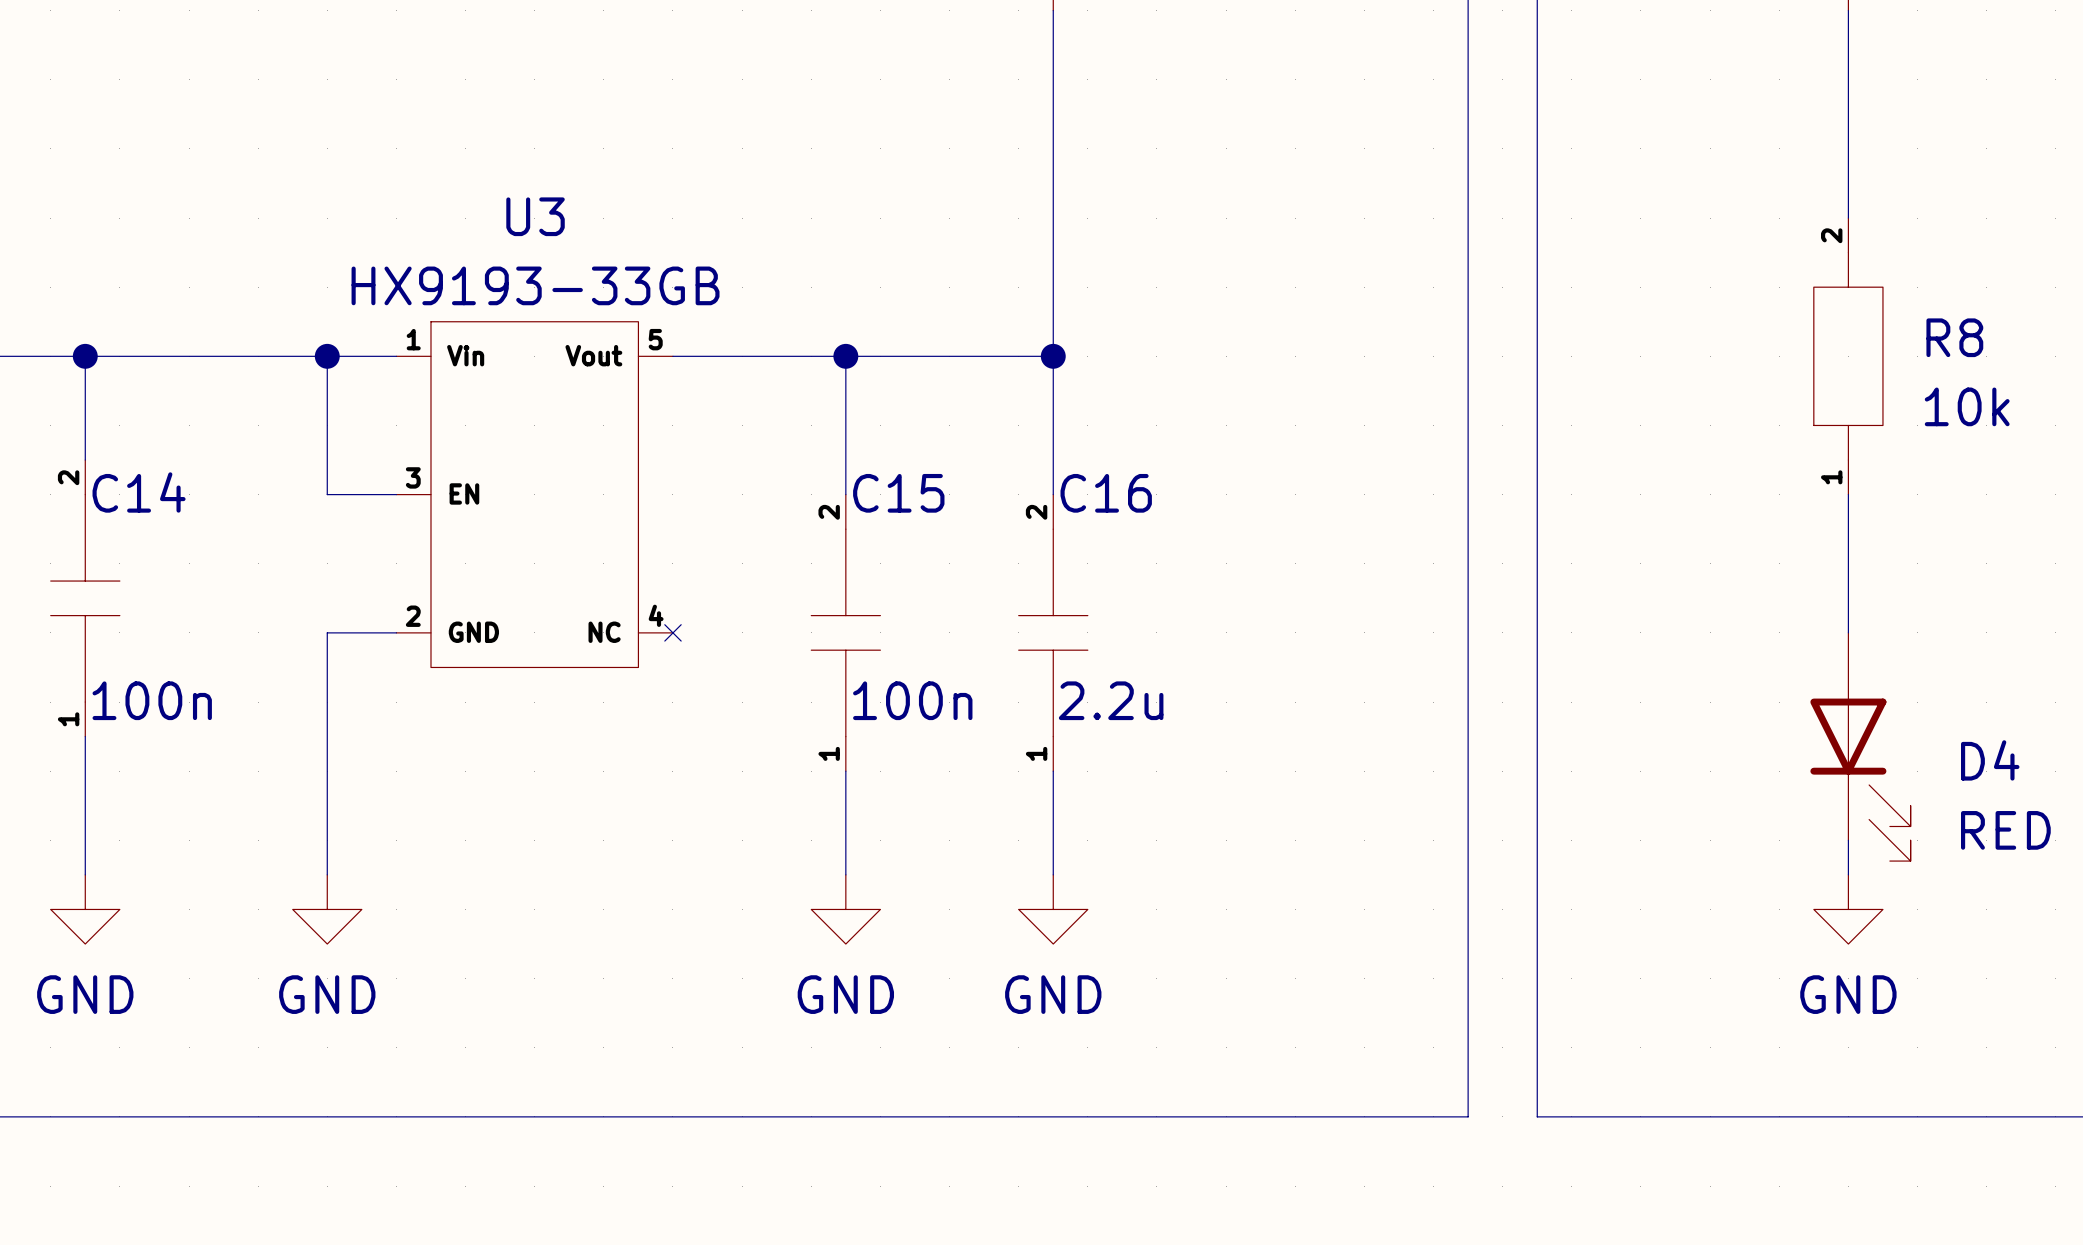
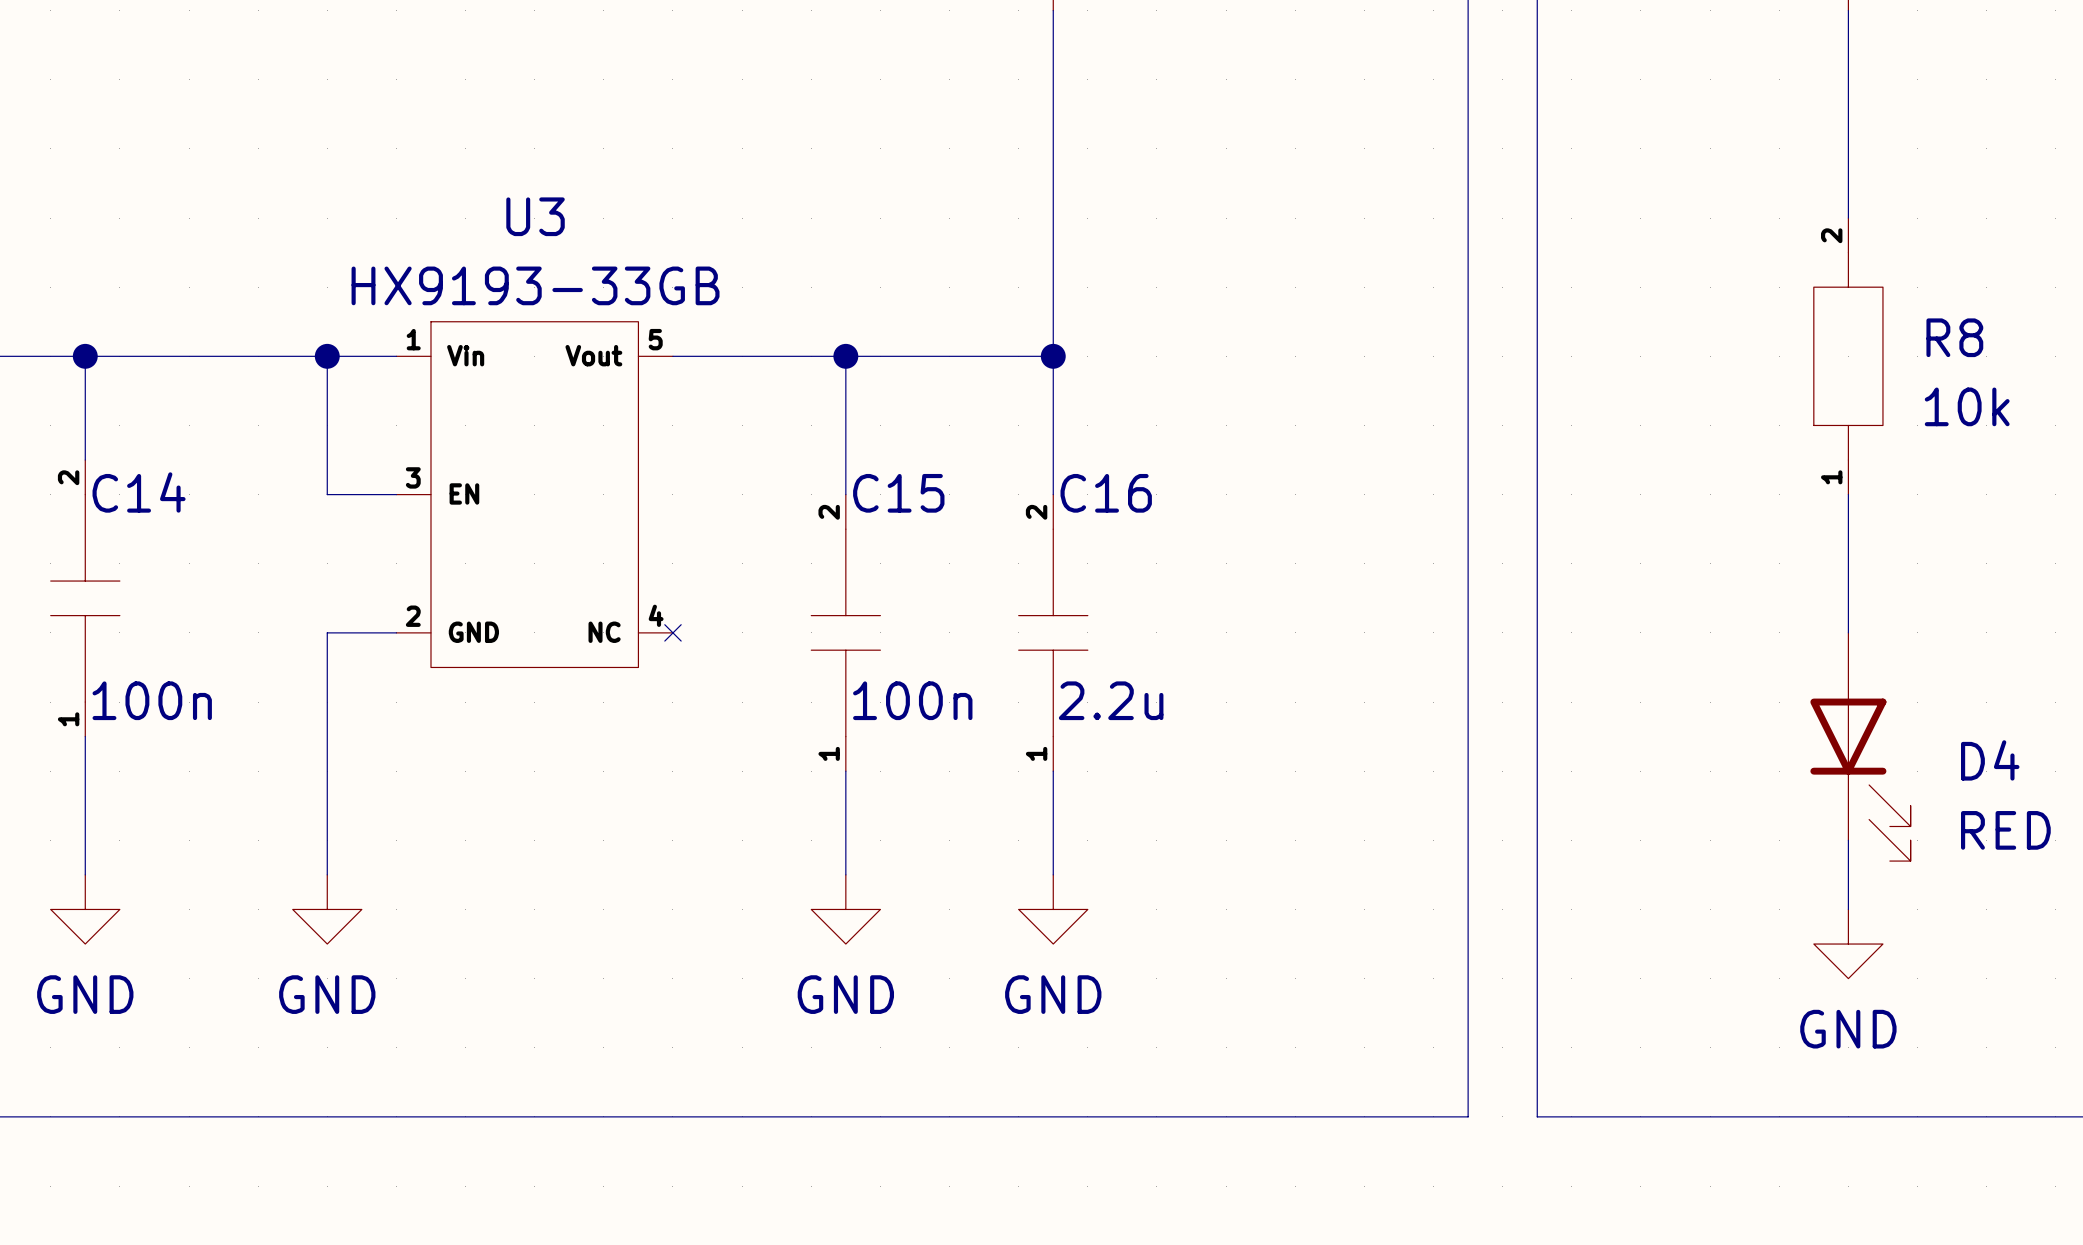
power symbol position: GND (1848, 909) -> GND (1848, 944)

